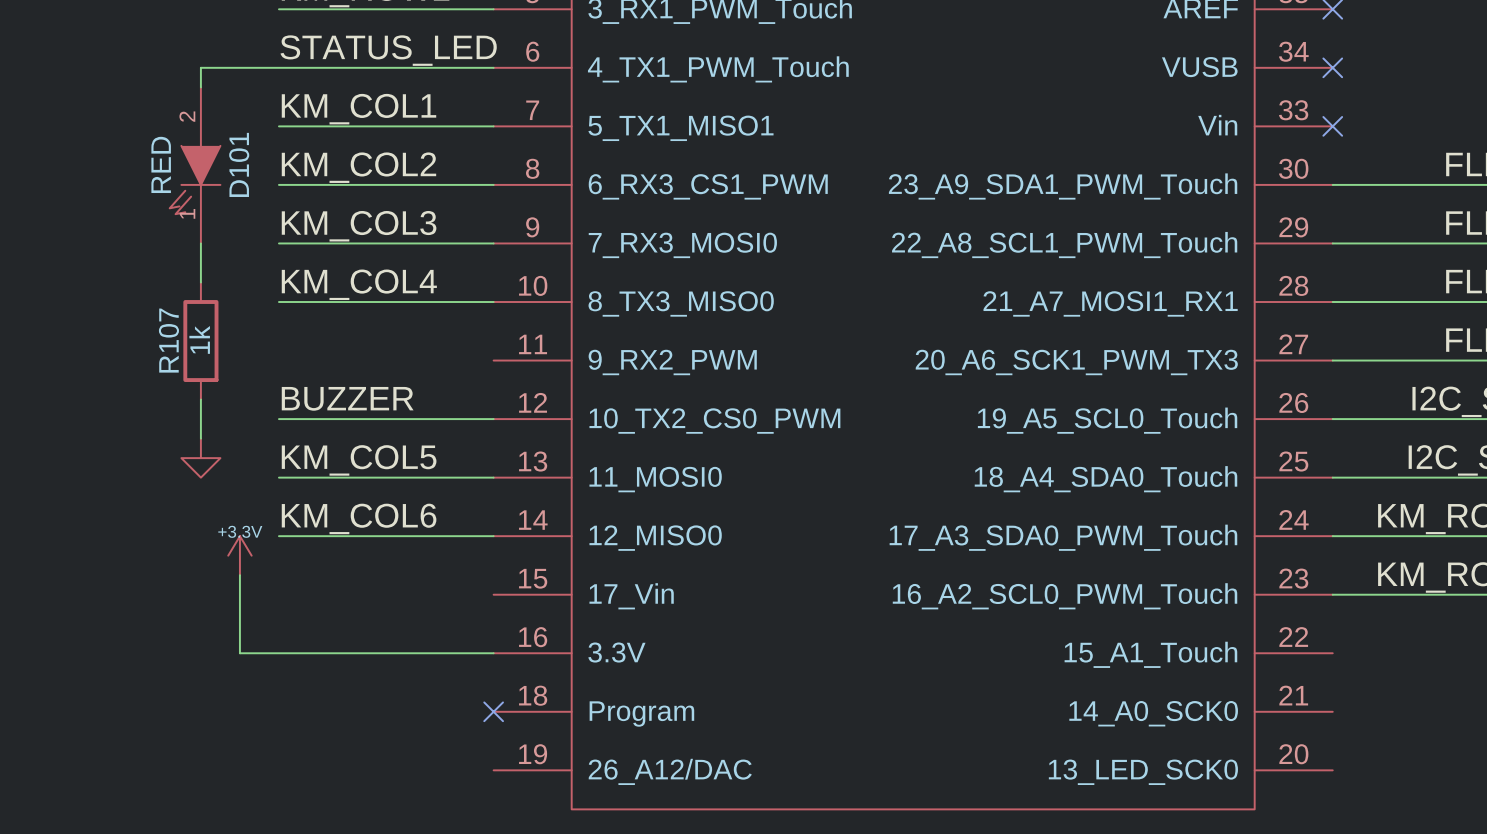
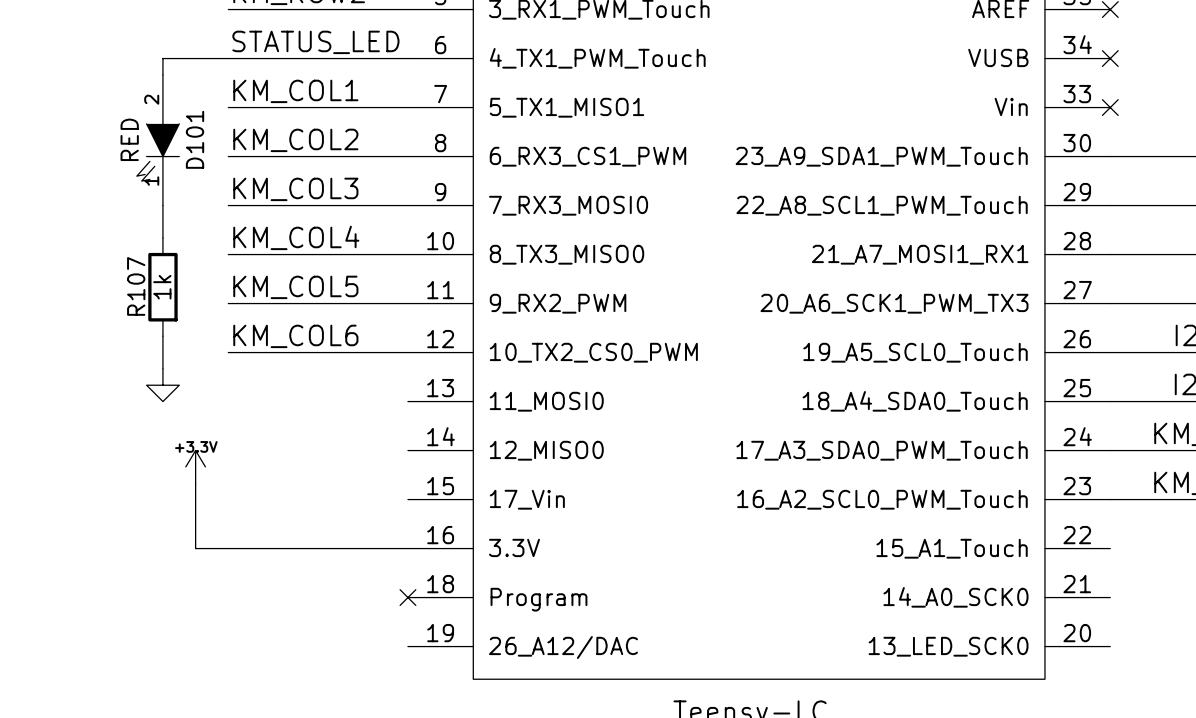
label: BUZZER (347, 398) -> KM_COL6 (295, 336)
label position: KM_COL5 (359, 460) -> KM_COL5 (295, 287)
wire: (278, 477) (493, 477) -> (228, 303) (407, 303)
label: KM_COL6 (359, 518) -> none
wire: (278, 536) (493, 536) -> none

